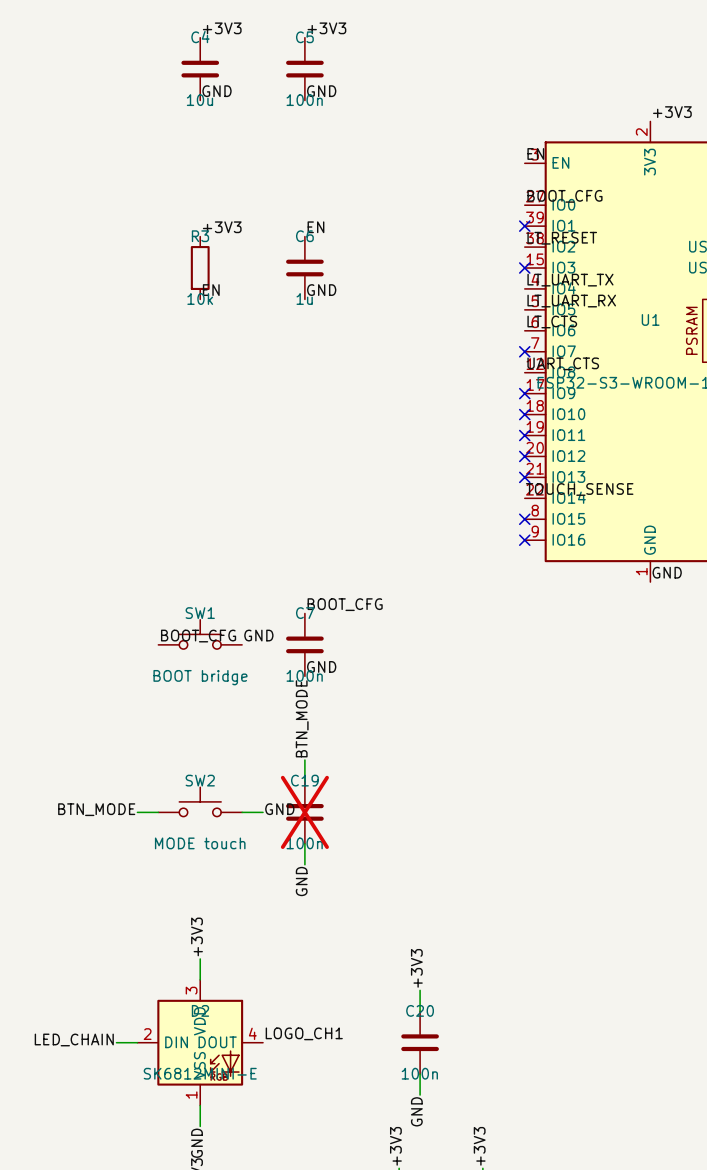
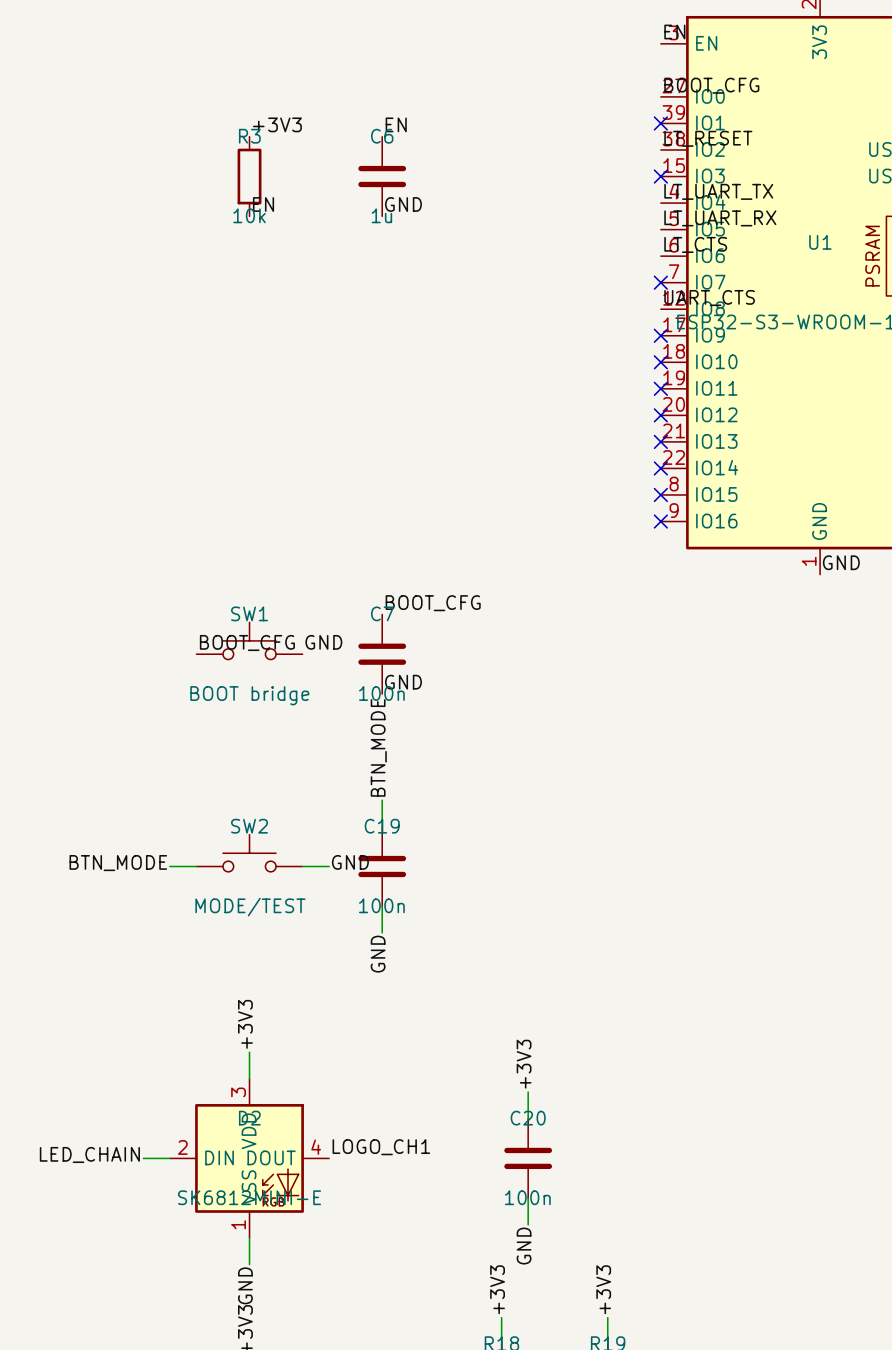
label: TOUCH_SENSE (579, 489) -> none
no-connect mark: none -> (660, 468)
C19 do-not-place cross: (304, 812) -> none
SW2 value: MODE touch (200, 843) -> MODE/TEST (250, 907)

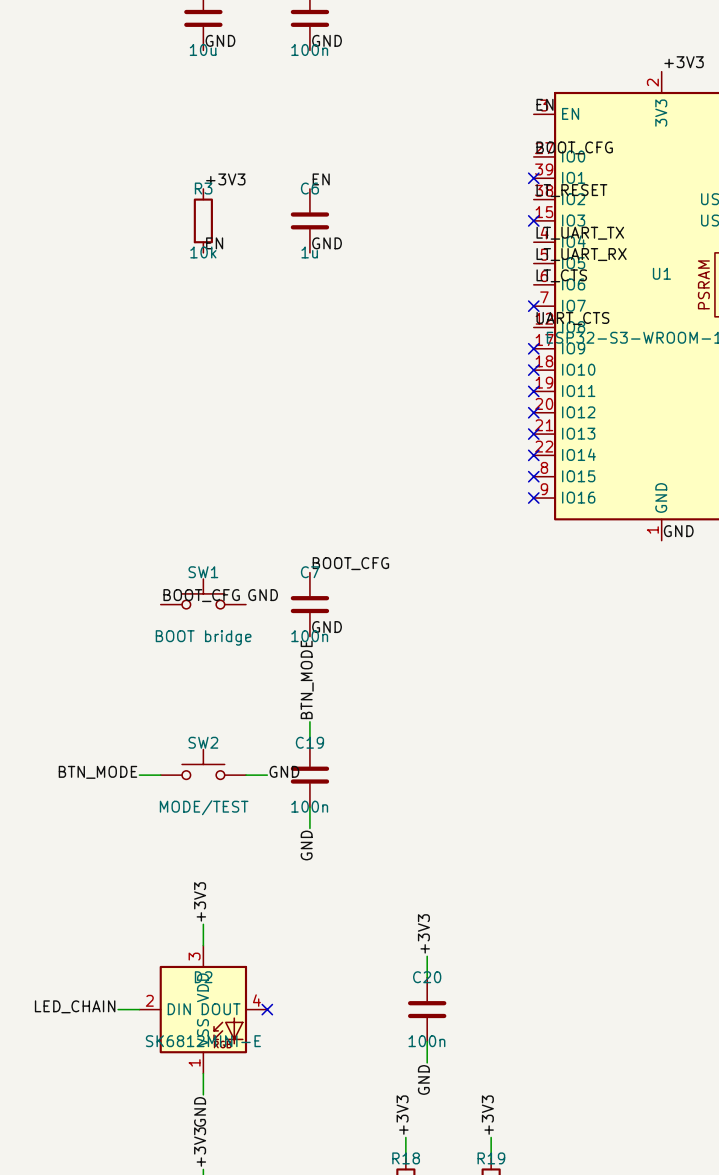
label: LOGO_CH1 (381, 1147) -> none
no-connect mark: none -> (267, 1009)

